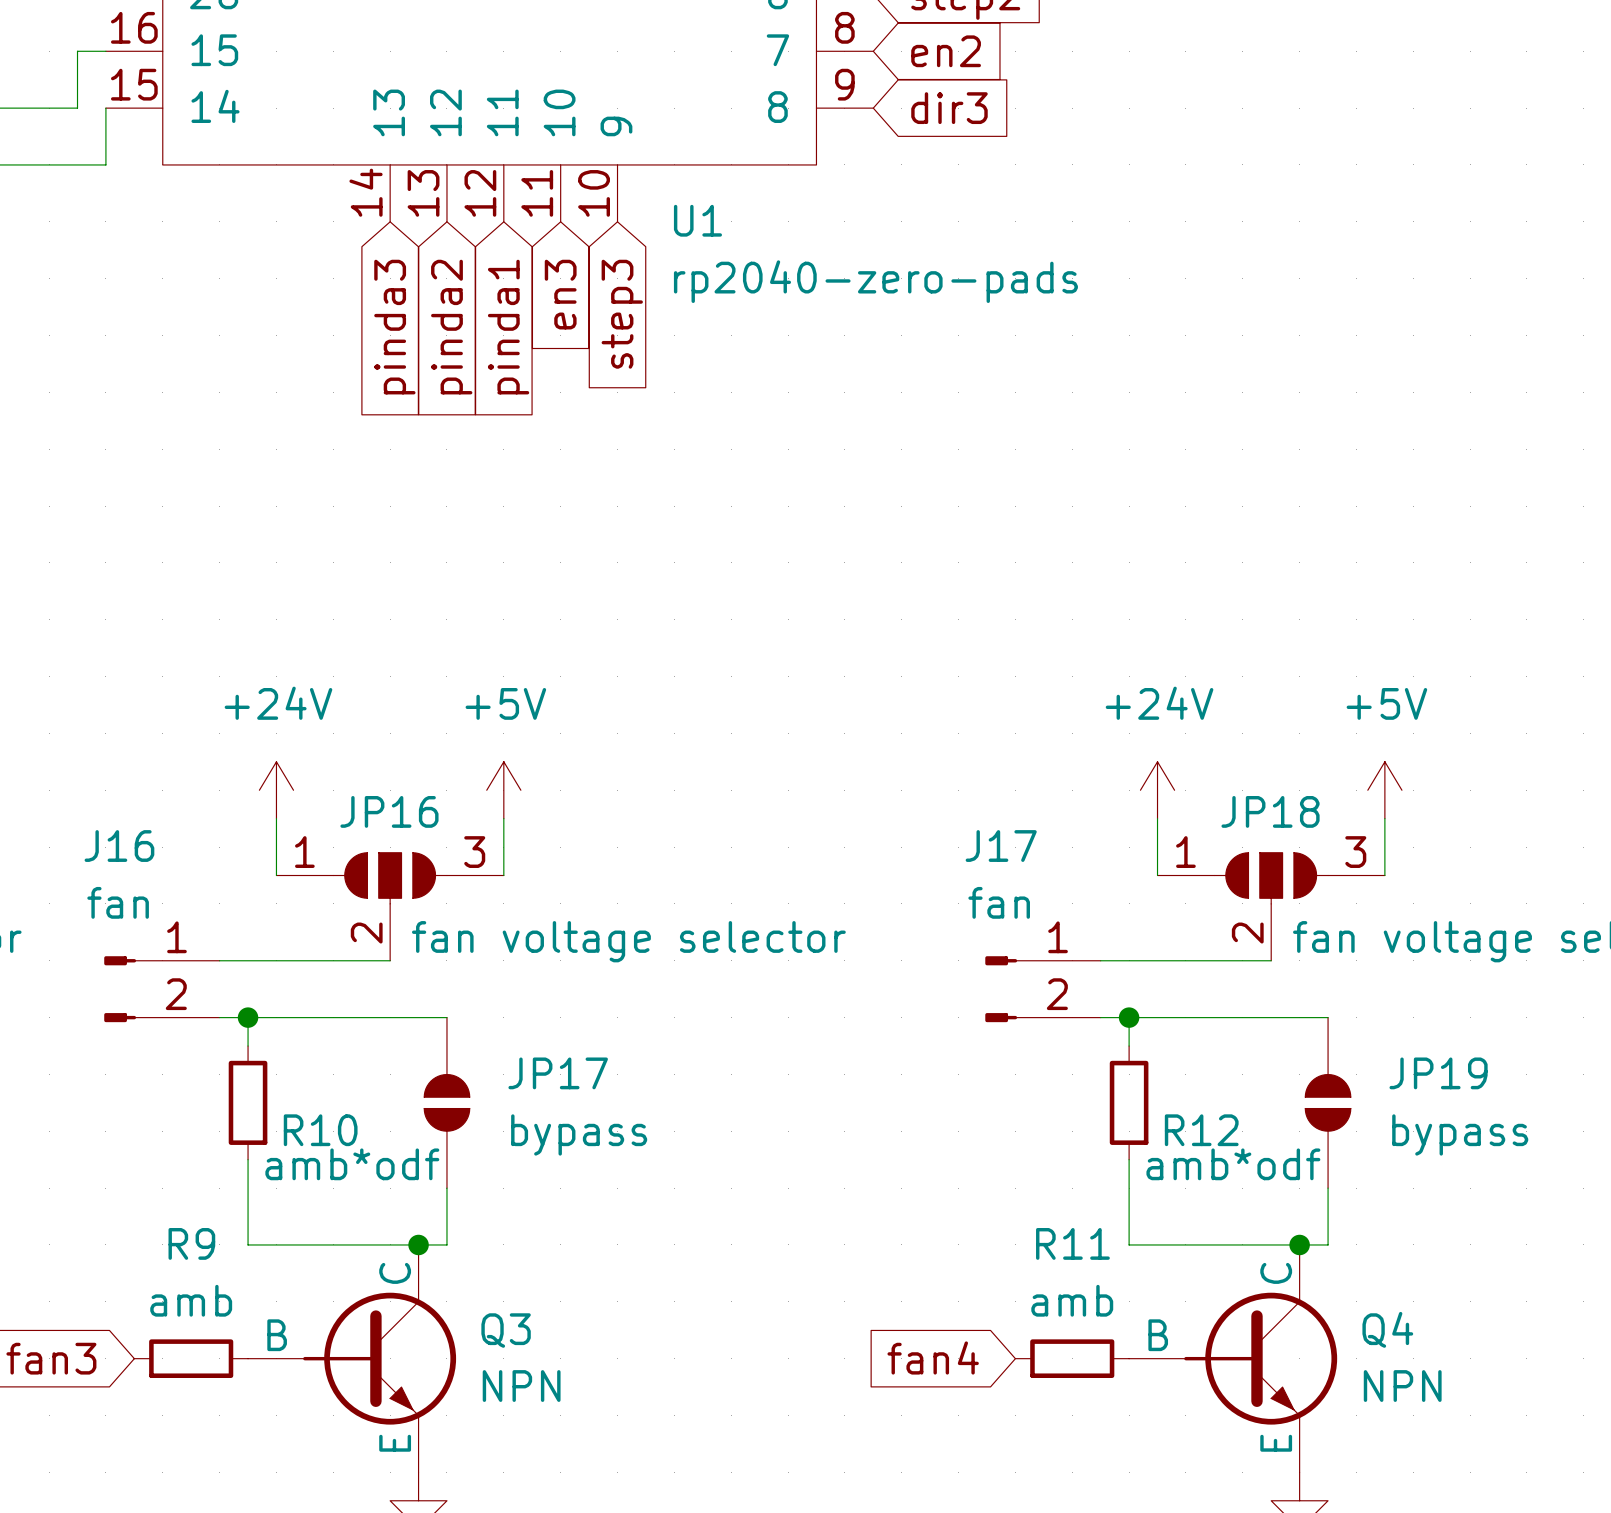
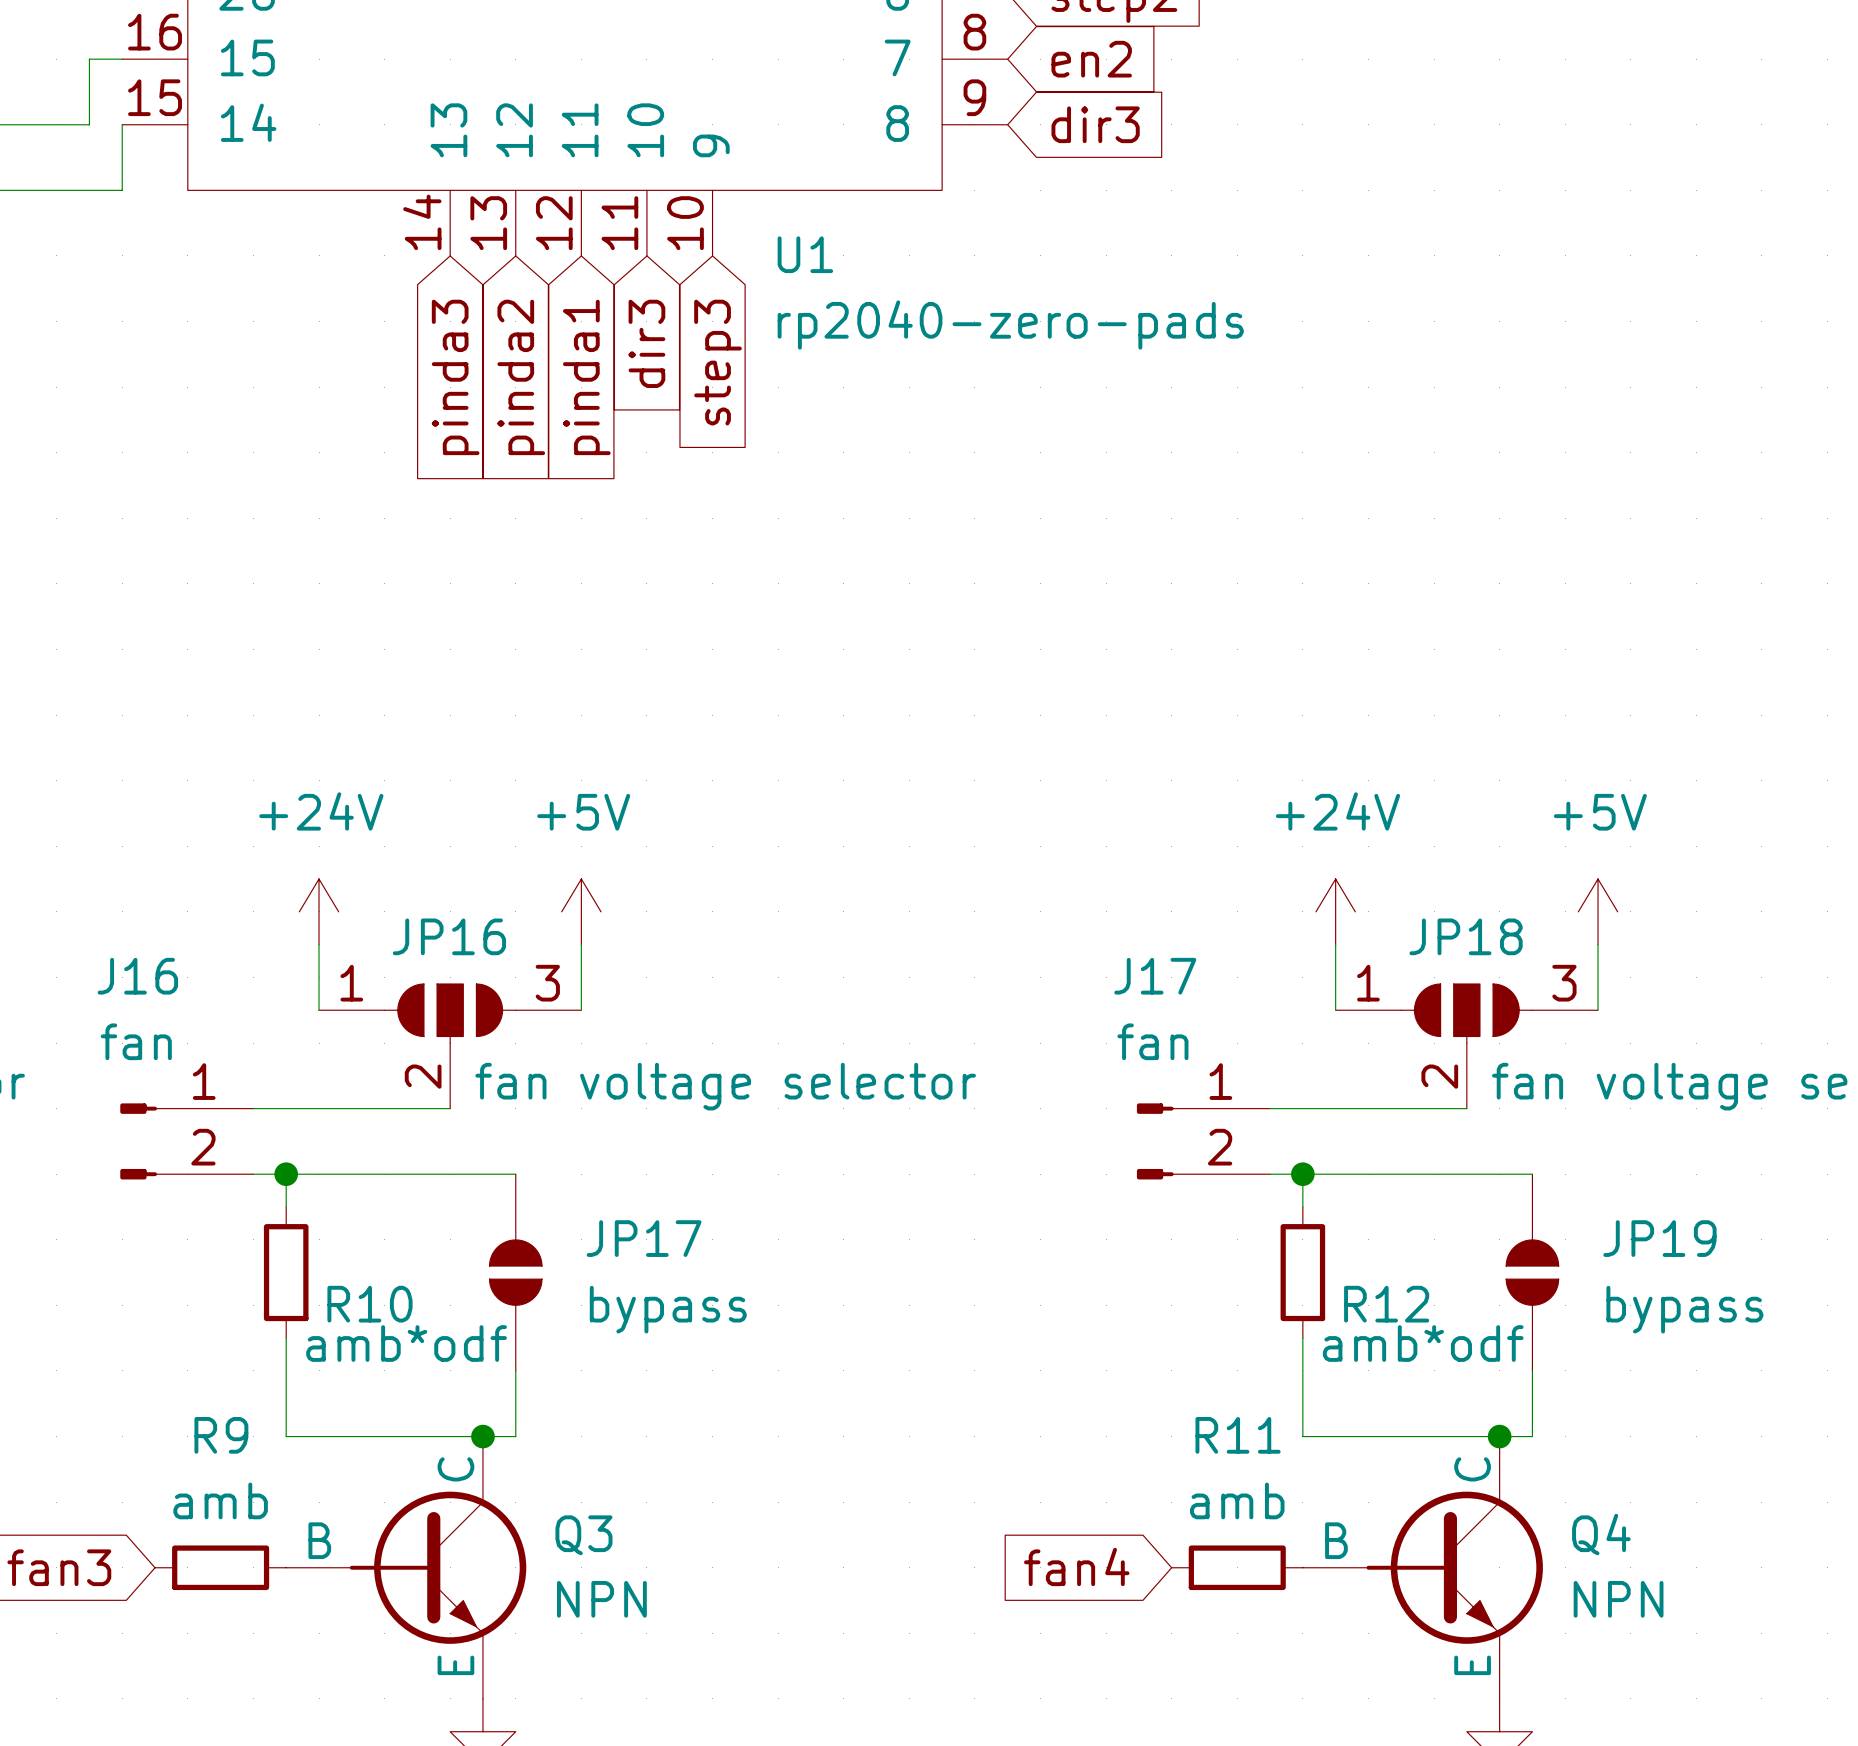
global label: en3 (560, 294) -> dir3 (646, 343)

